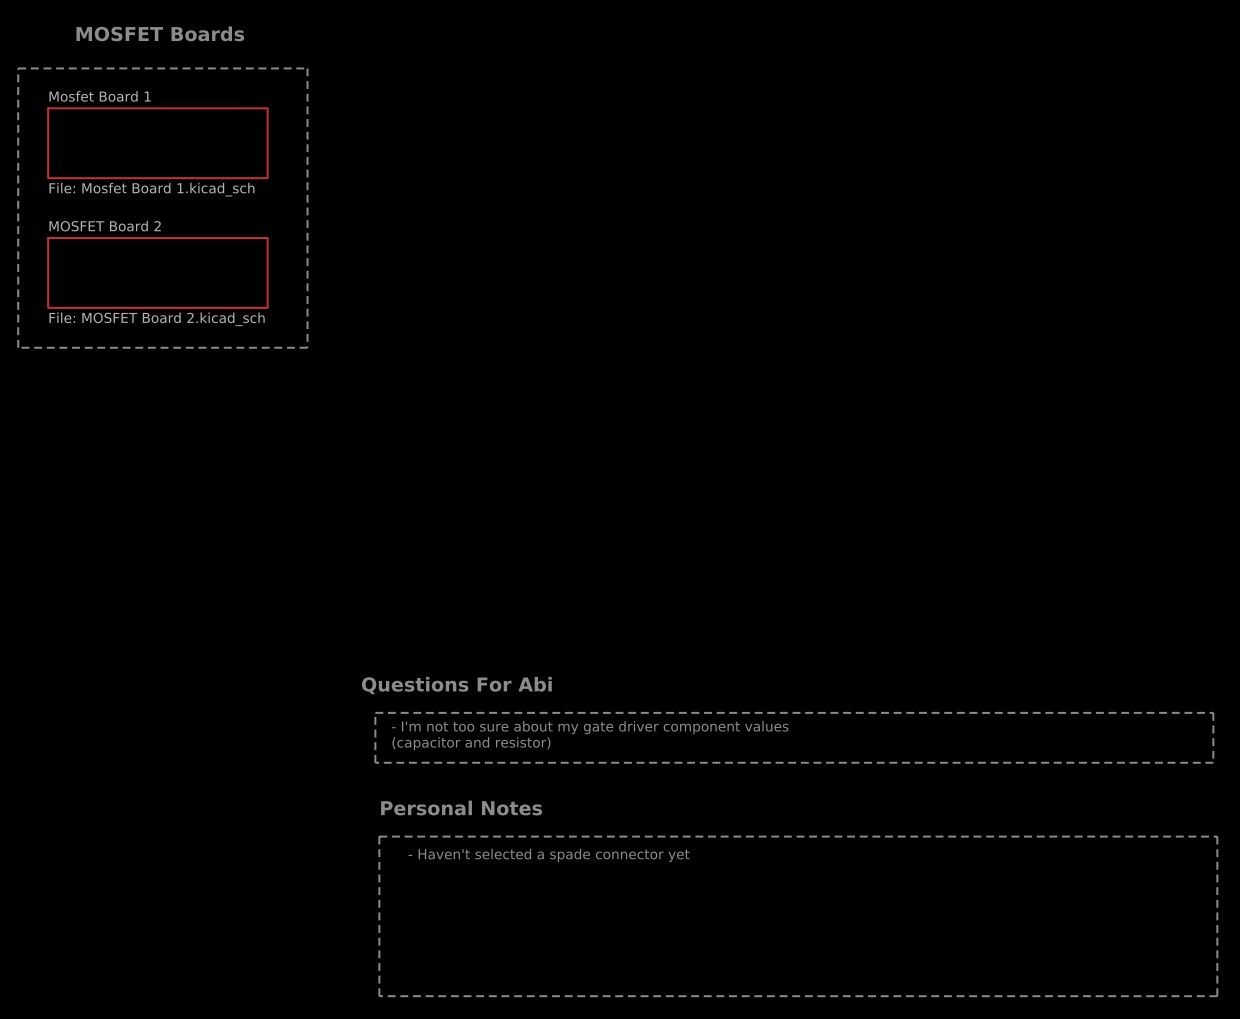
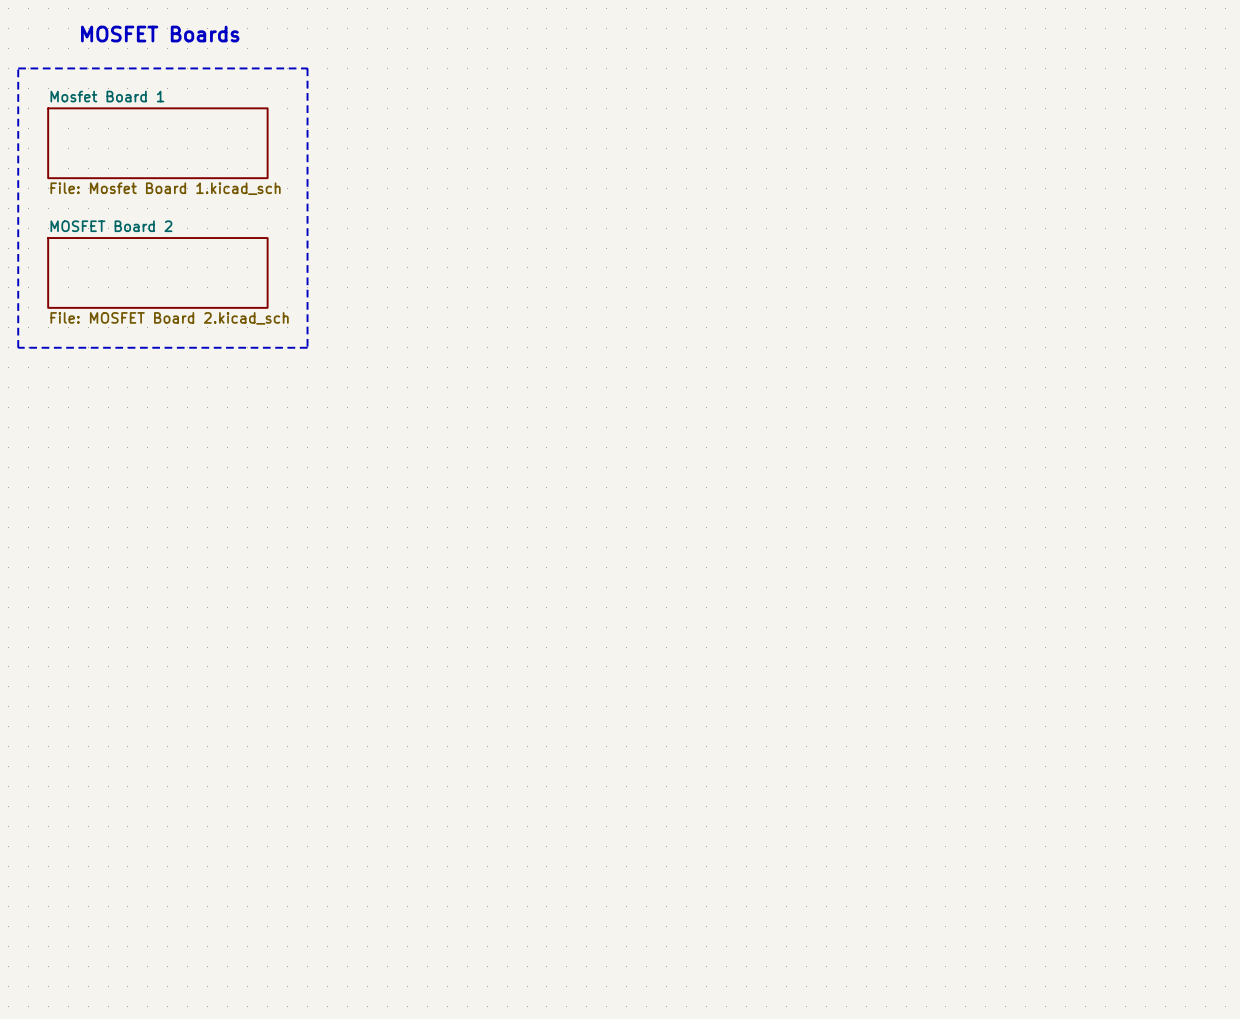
text: Questions For Abi (456, 685) -> none
line: (375, 712) (1213, 712) (1213, 762) (375, 762) (375, 712) -> none
text: - I'm not too sure about my gate driver component values (590, 727) -> none
text: (capacitor and resistor) (471, 743) -> none
text: Personal Notes (461, 808) -> none
line: (379, 836) (1217, 836) (1217, 996) (379, 996) (379, 836) -> none
text: - Haven't selected a spade connector yet (549, 855) -> none

